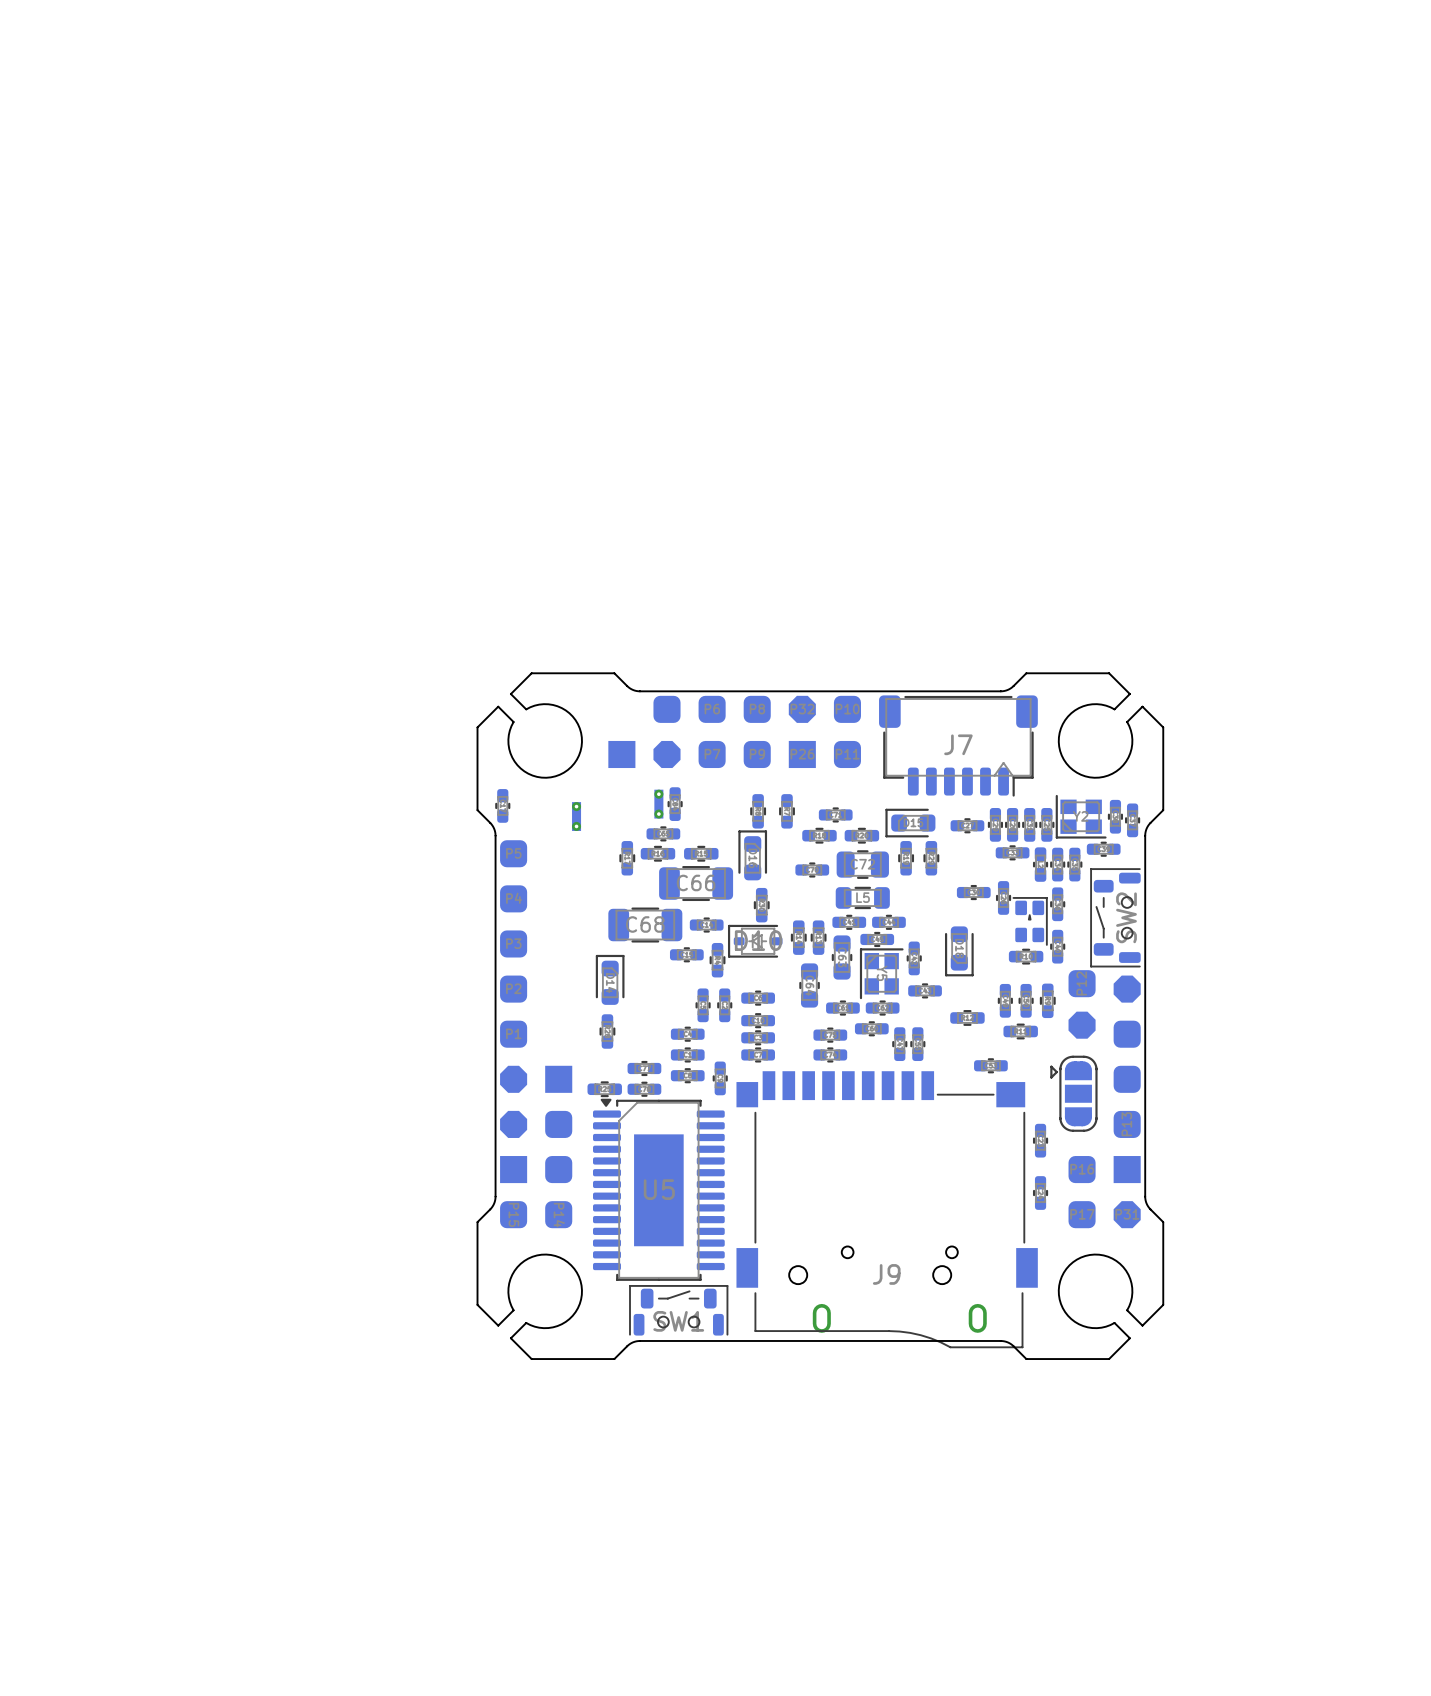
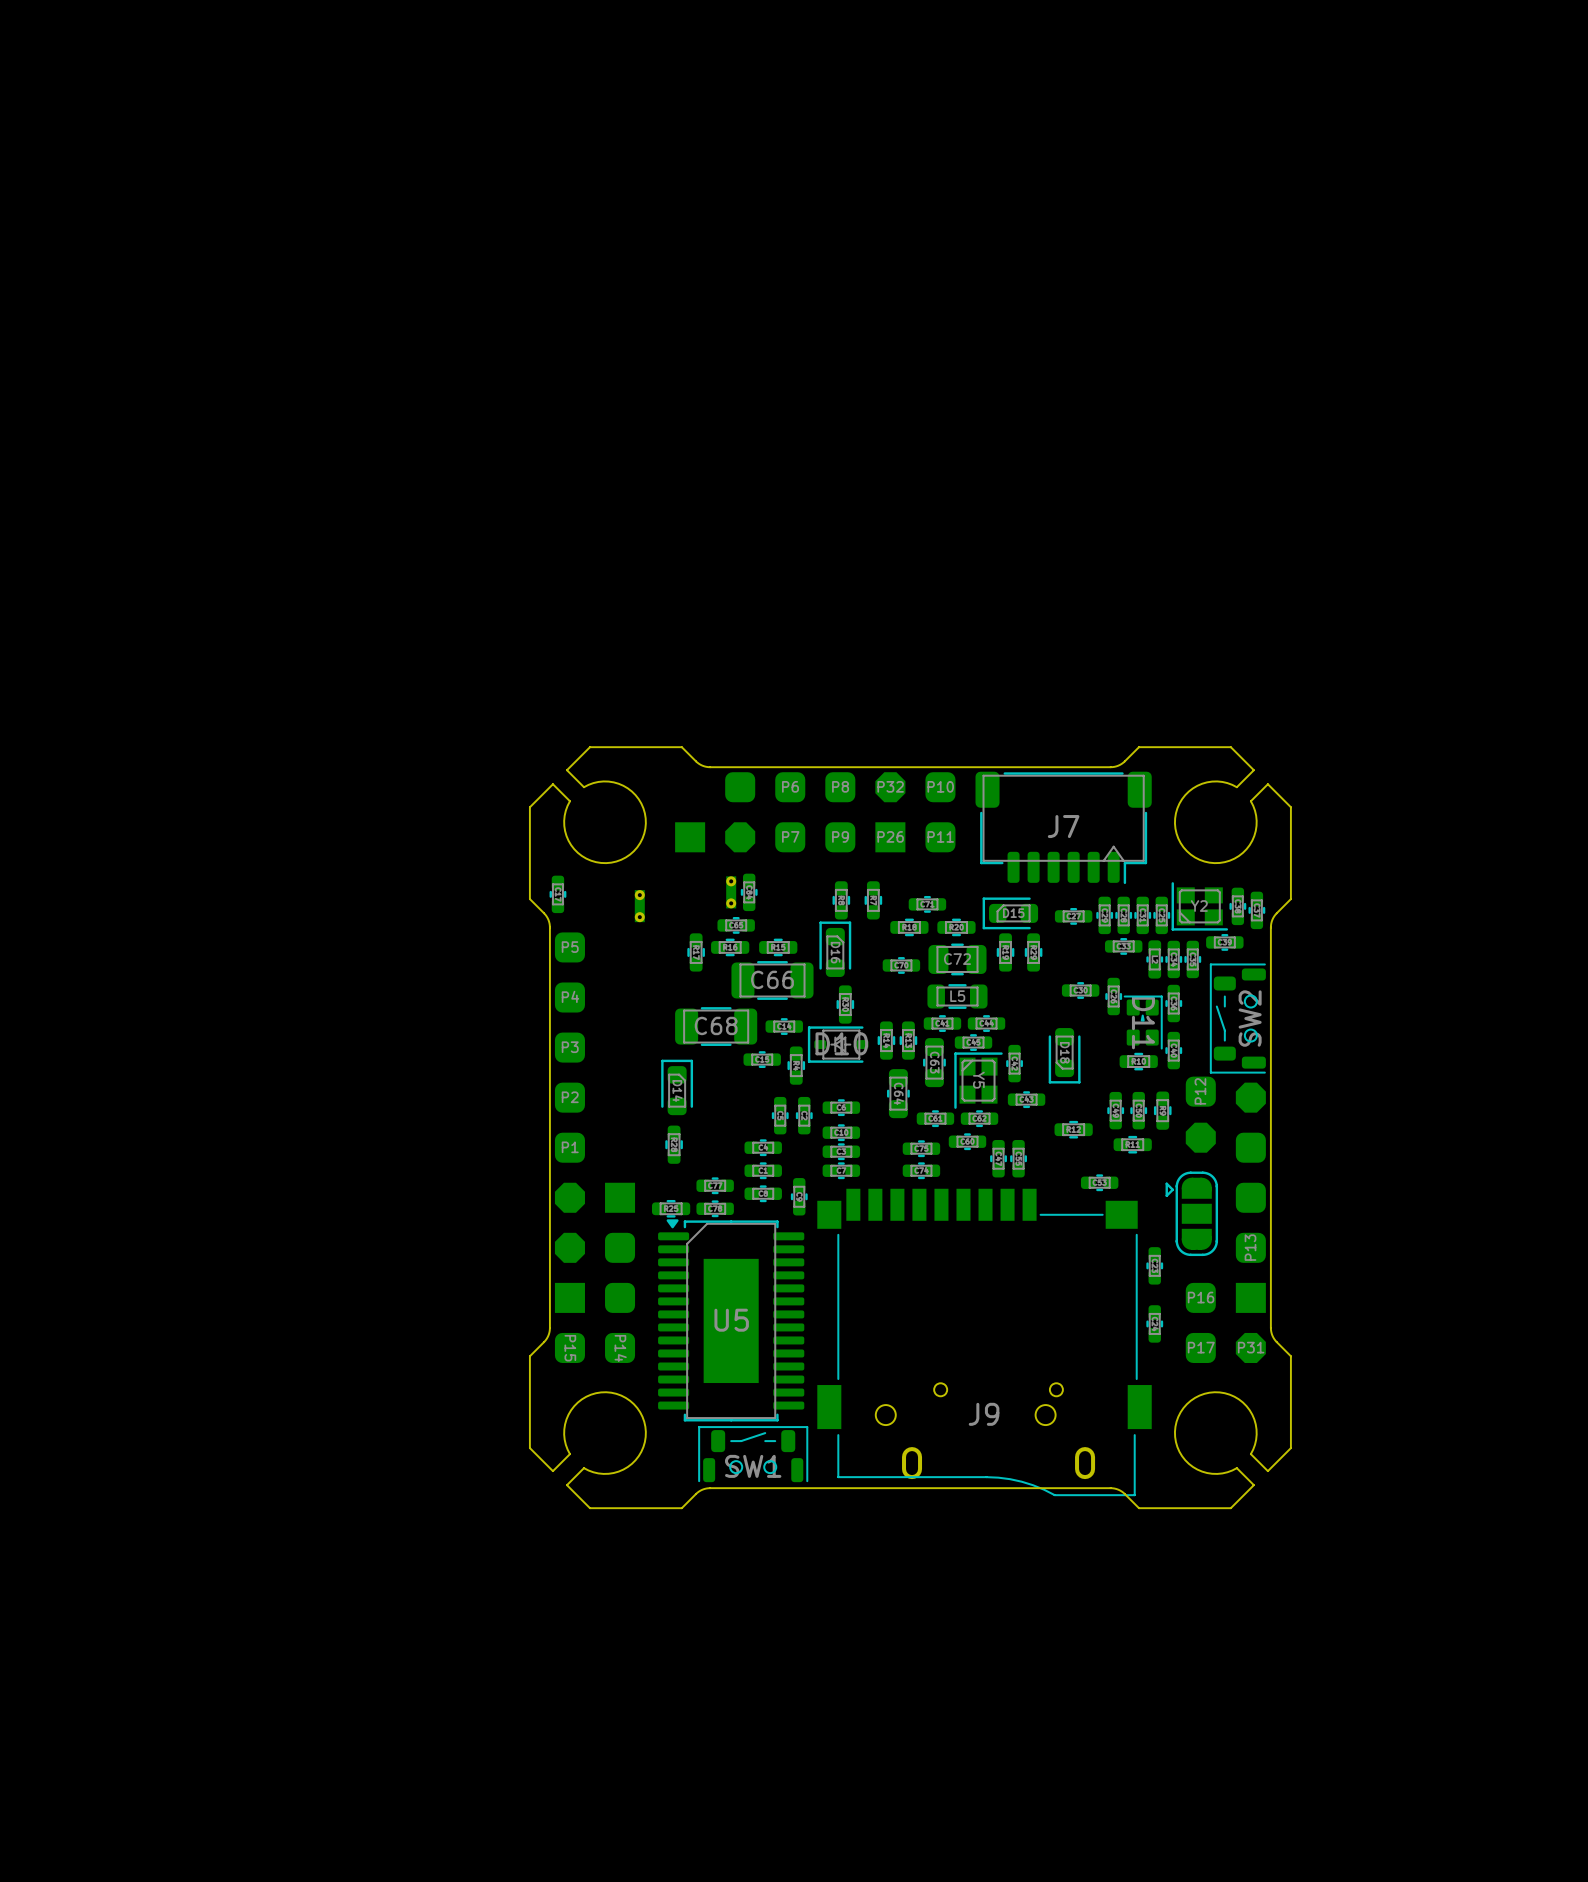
D11 name: none -> D11 (1143, 1023)

